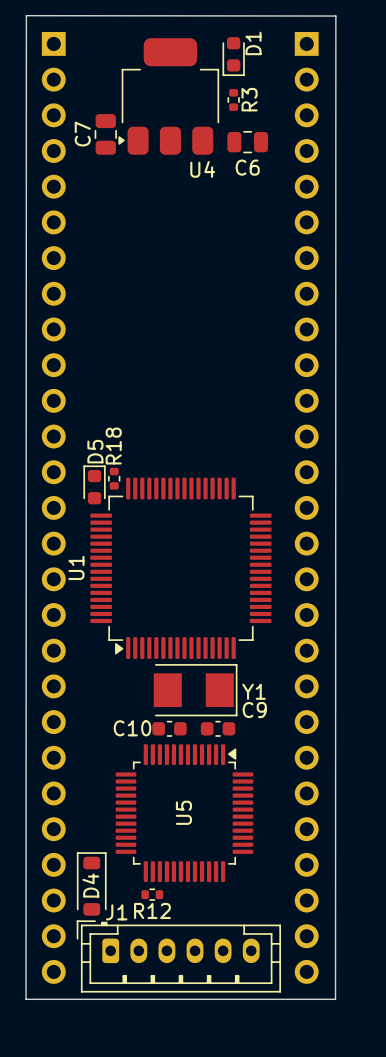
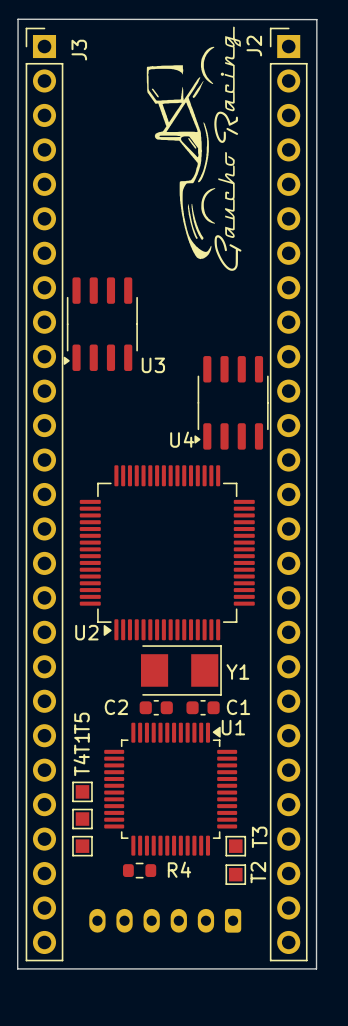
drawing: none -> [146, 26, 242, 271]
U4 footprint: [118, 38, 220, 155] -> [194, 356, 269, 450]
D1: (233, 56) -> none
R3: (233, 100) -> none
C7: (105, 134) -> none
C6: (247, 142) -> none
U4 name position: U4 (202, 169) -> U4 (182, 439)
U3: none -> (100, 324)
R18: (114, 478) -> none
D5: (94, 484) -> none
J3 side: bottom (53, 507) -> top (44, 494)
J2 side: bottom (306, 507) -> top (288, 494)
U1 name: U1 (76, 567) -> U2 (86, 632)
C9 name: C9 (254, 710) -> C1 (238, 707)
C10 name: C10 (132, 728) -> C2 (116, 707)
U5 name: U5 (183, 812) -> U1 (233, 727)
T5: none -> (82, 791)
T1: none -> (82, 819)
T4: none -> (82, 846)
T3: none -> (235, 846)
D4: (91, 883) -> none
R12: (152, 894) -> none
R4: none -> (139, 870)
T2: none -> (235, 874)
J1 side: top (178, 956) -> bottom (165, 920)

